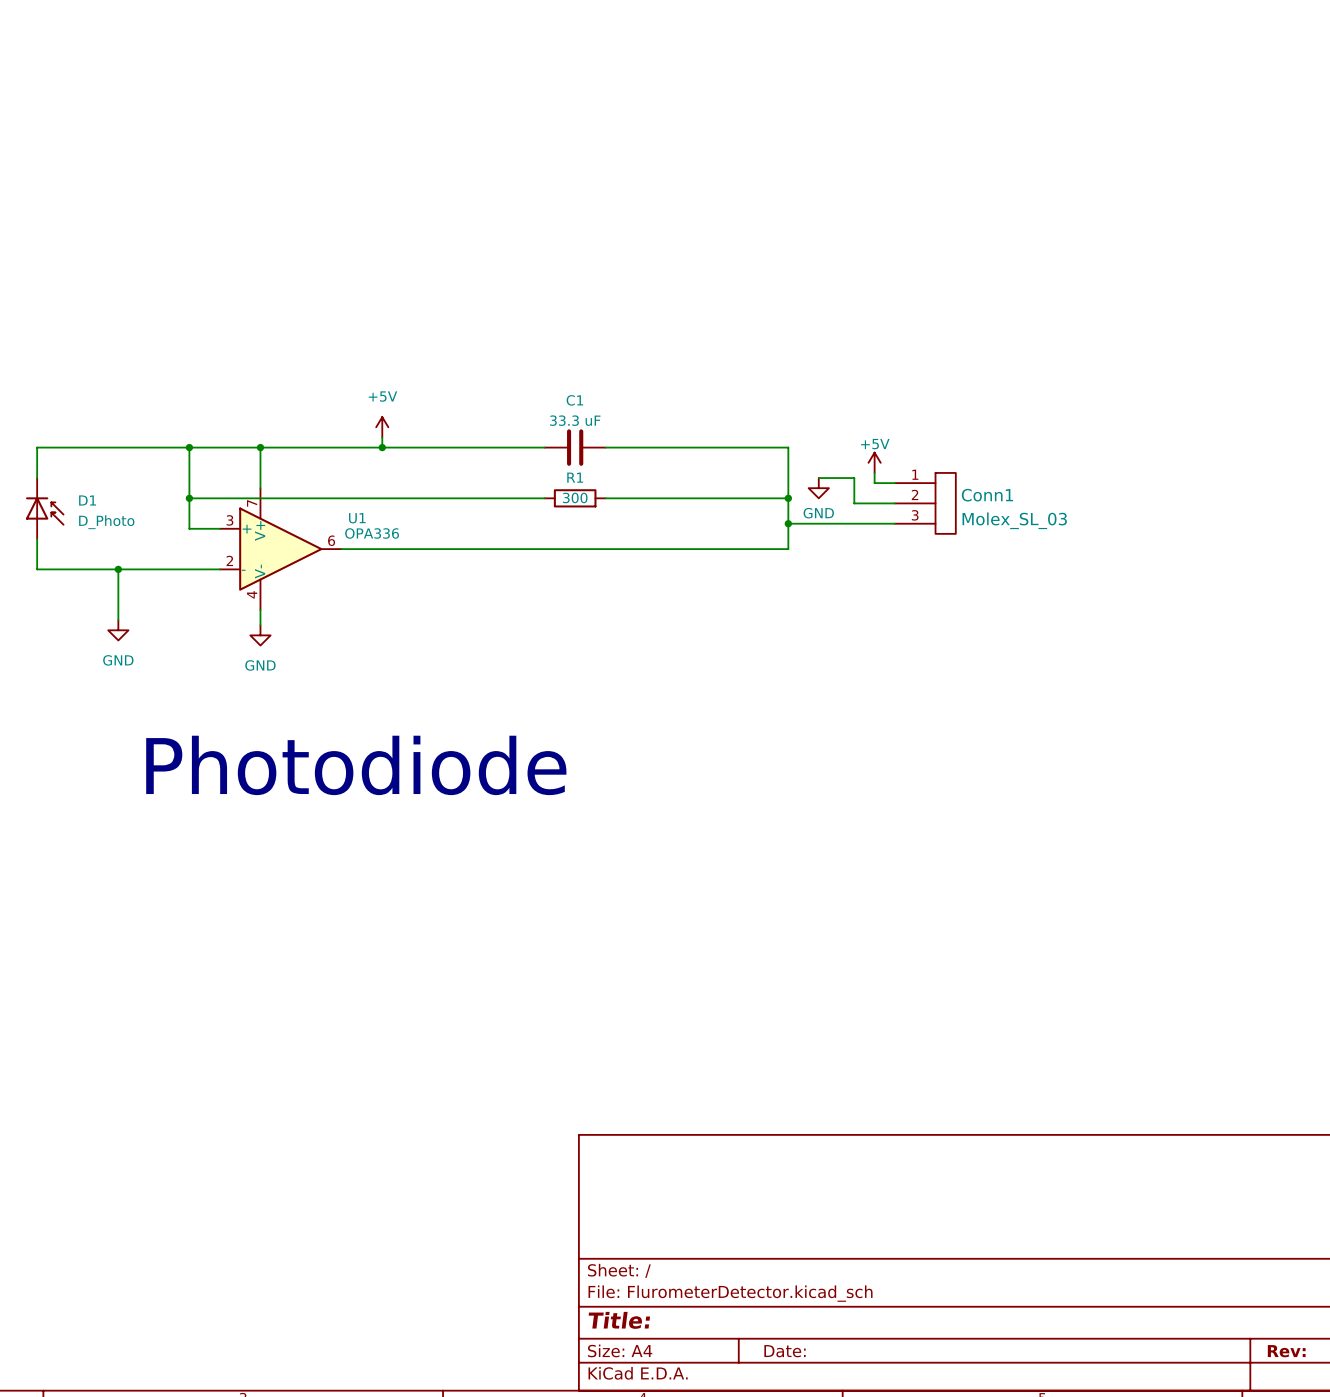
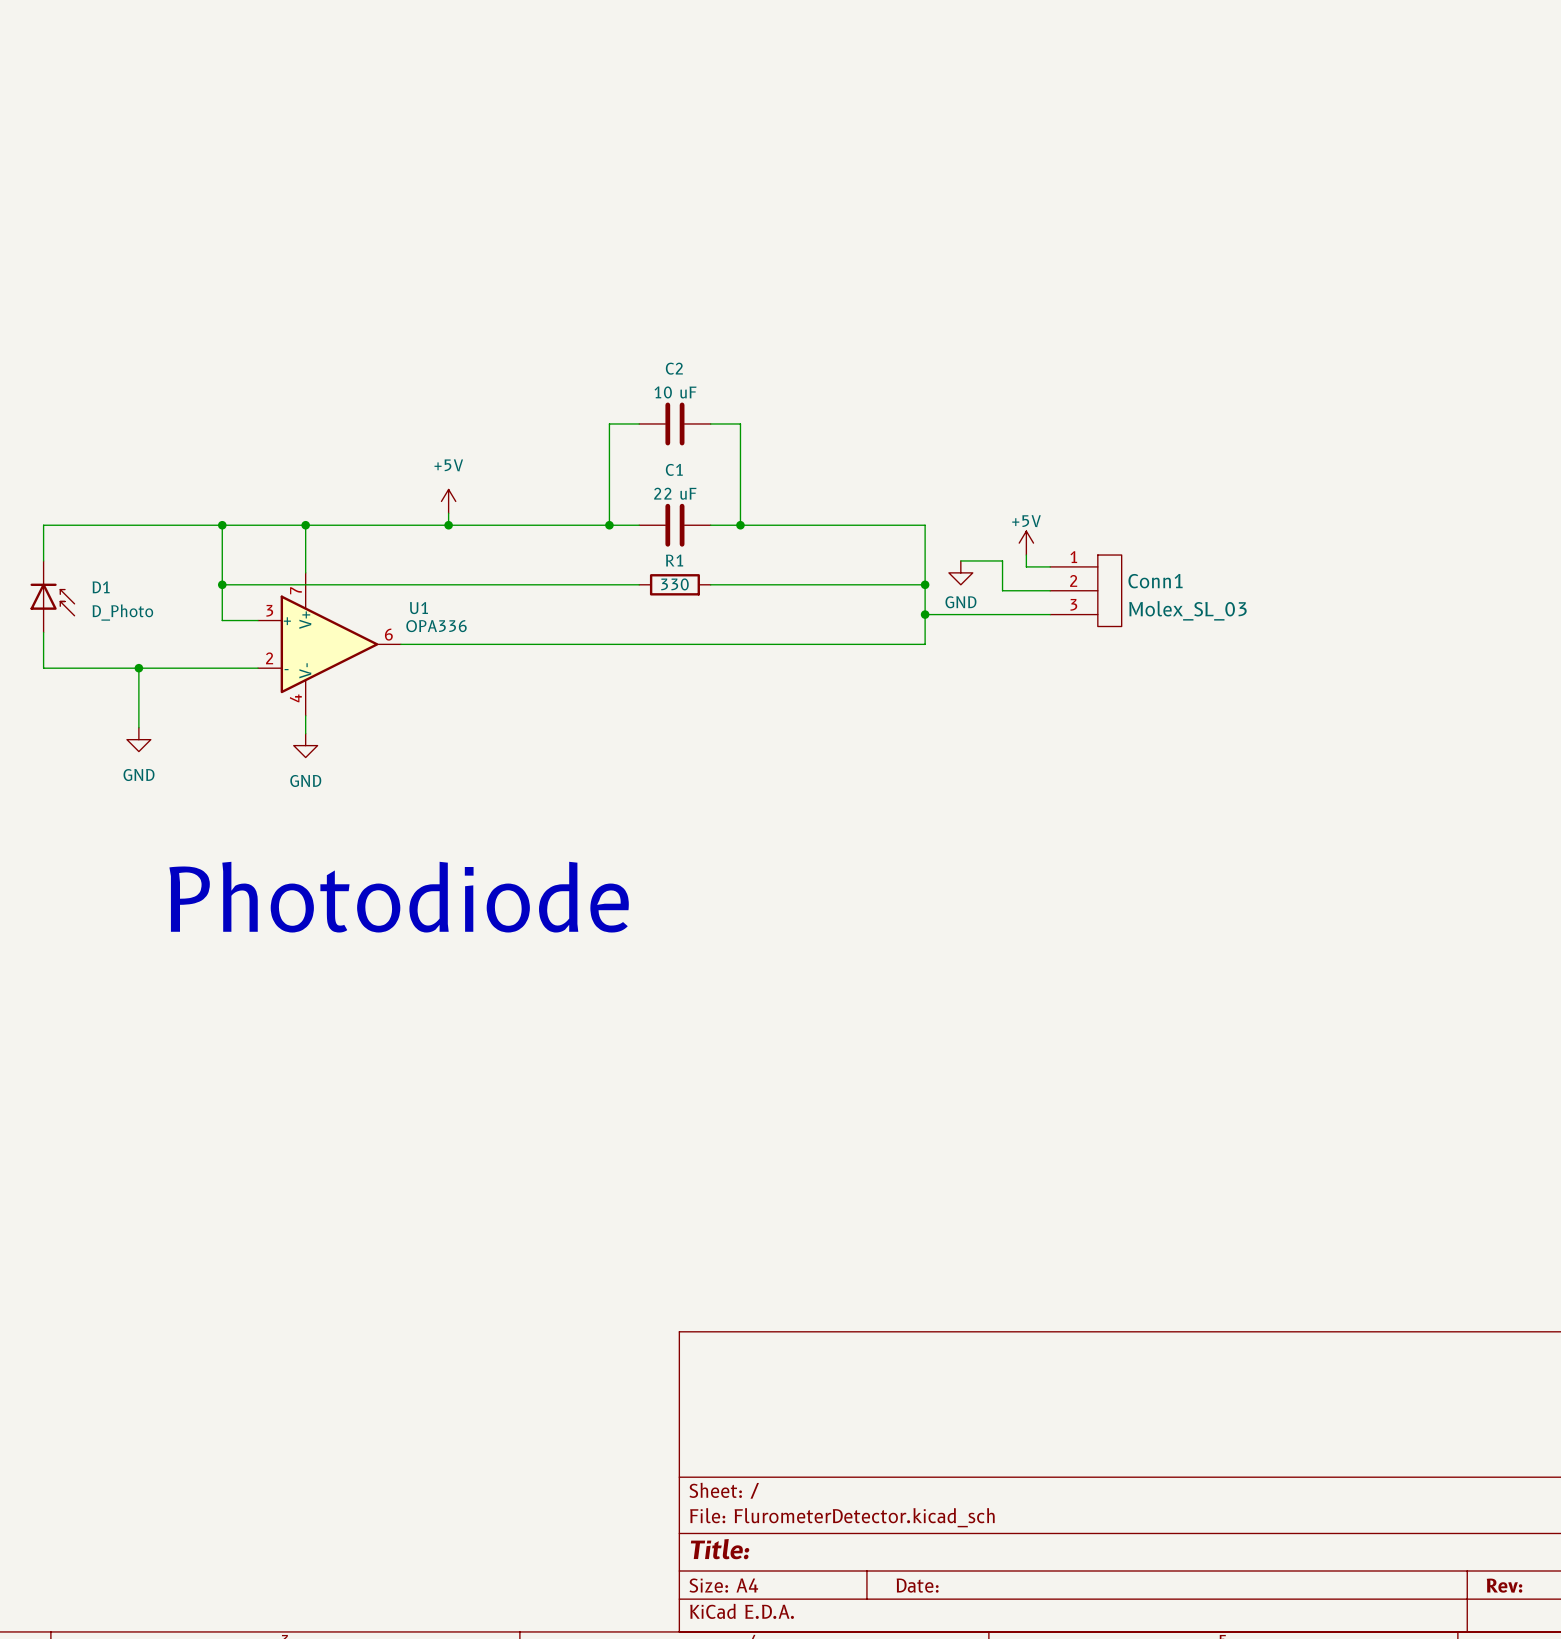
wire: none -> (639, 423) (609, 423) (609, 525)
C2: none -> 10 uF (674, 423)
wire: none -> (710, 423) (740, 423) (740, 525)
C1 value: 33.3 uF (575, 420) -> 22 uF (675, 493)
junction: none -> (609, 525)
junction: none -> (740, 525)
R1 value: 300 (575, 497) -> 330 (674, 584)

